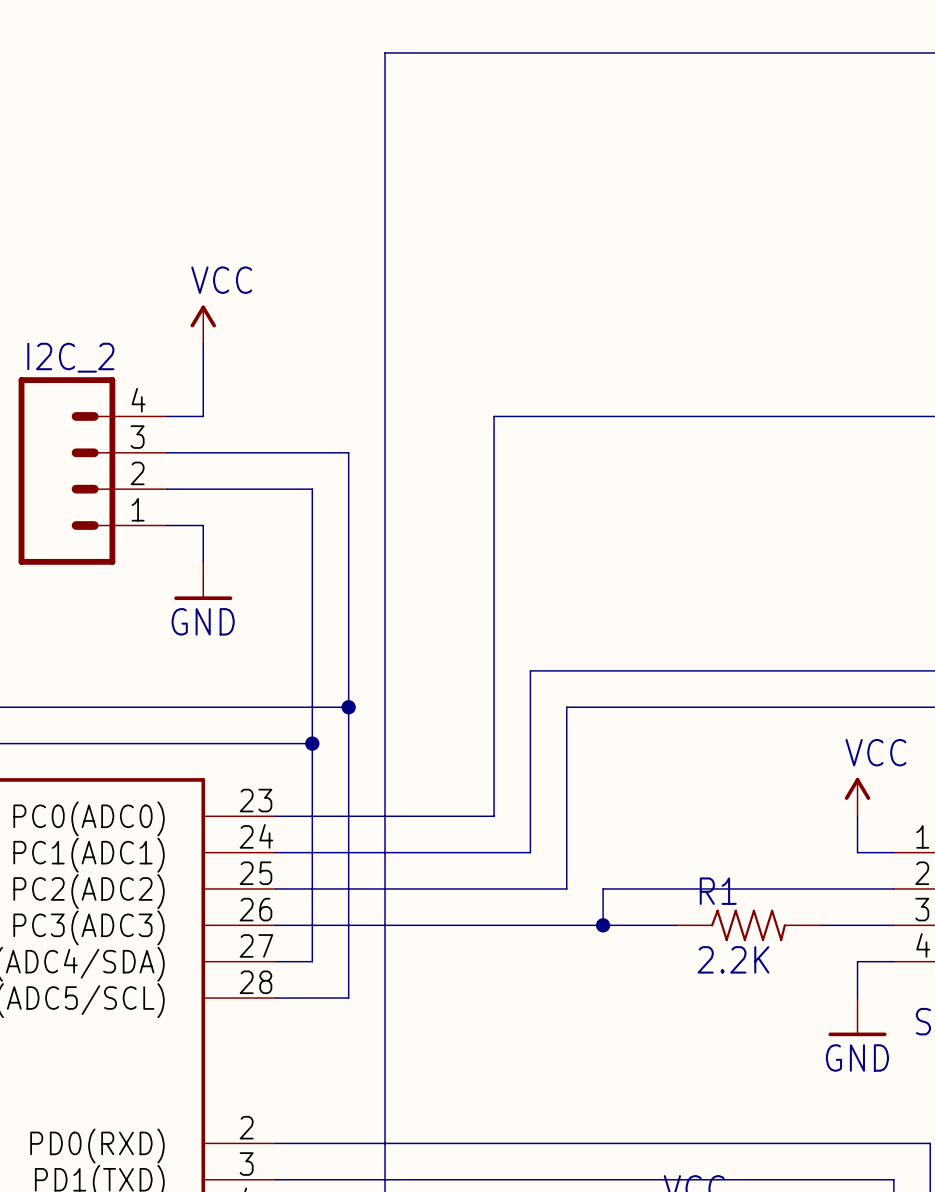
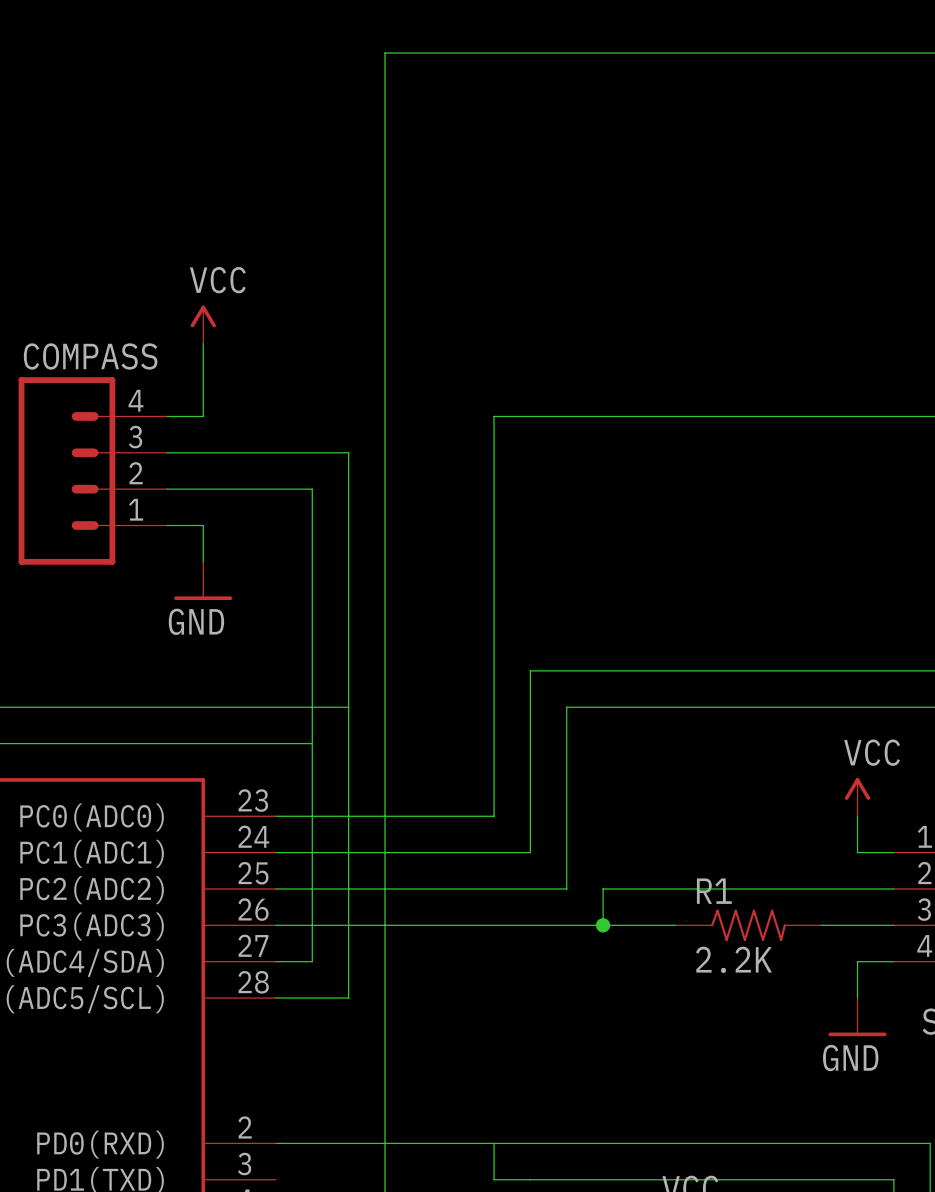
I2C_2 name: I2C_2 (70, 357) -> COMPASS (90, 356)
junction: (348, 707) -> none
junction: (312, 743) -> none
wire: (275, 1179) (494, 1179) -> (494, 1143) (494, 1179)

